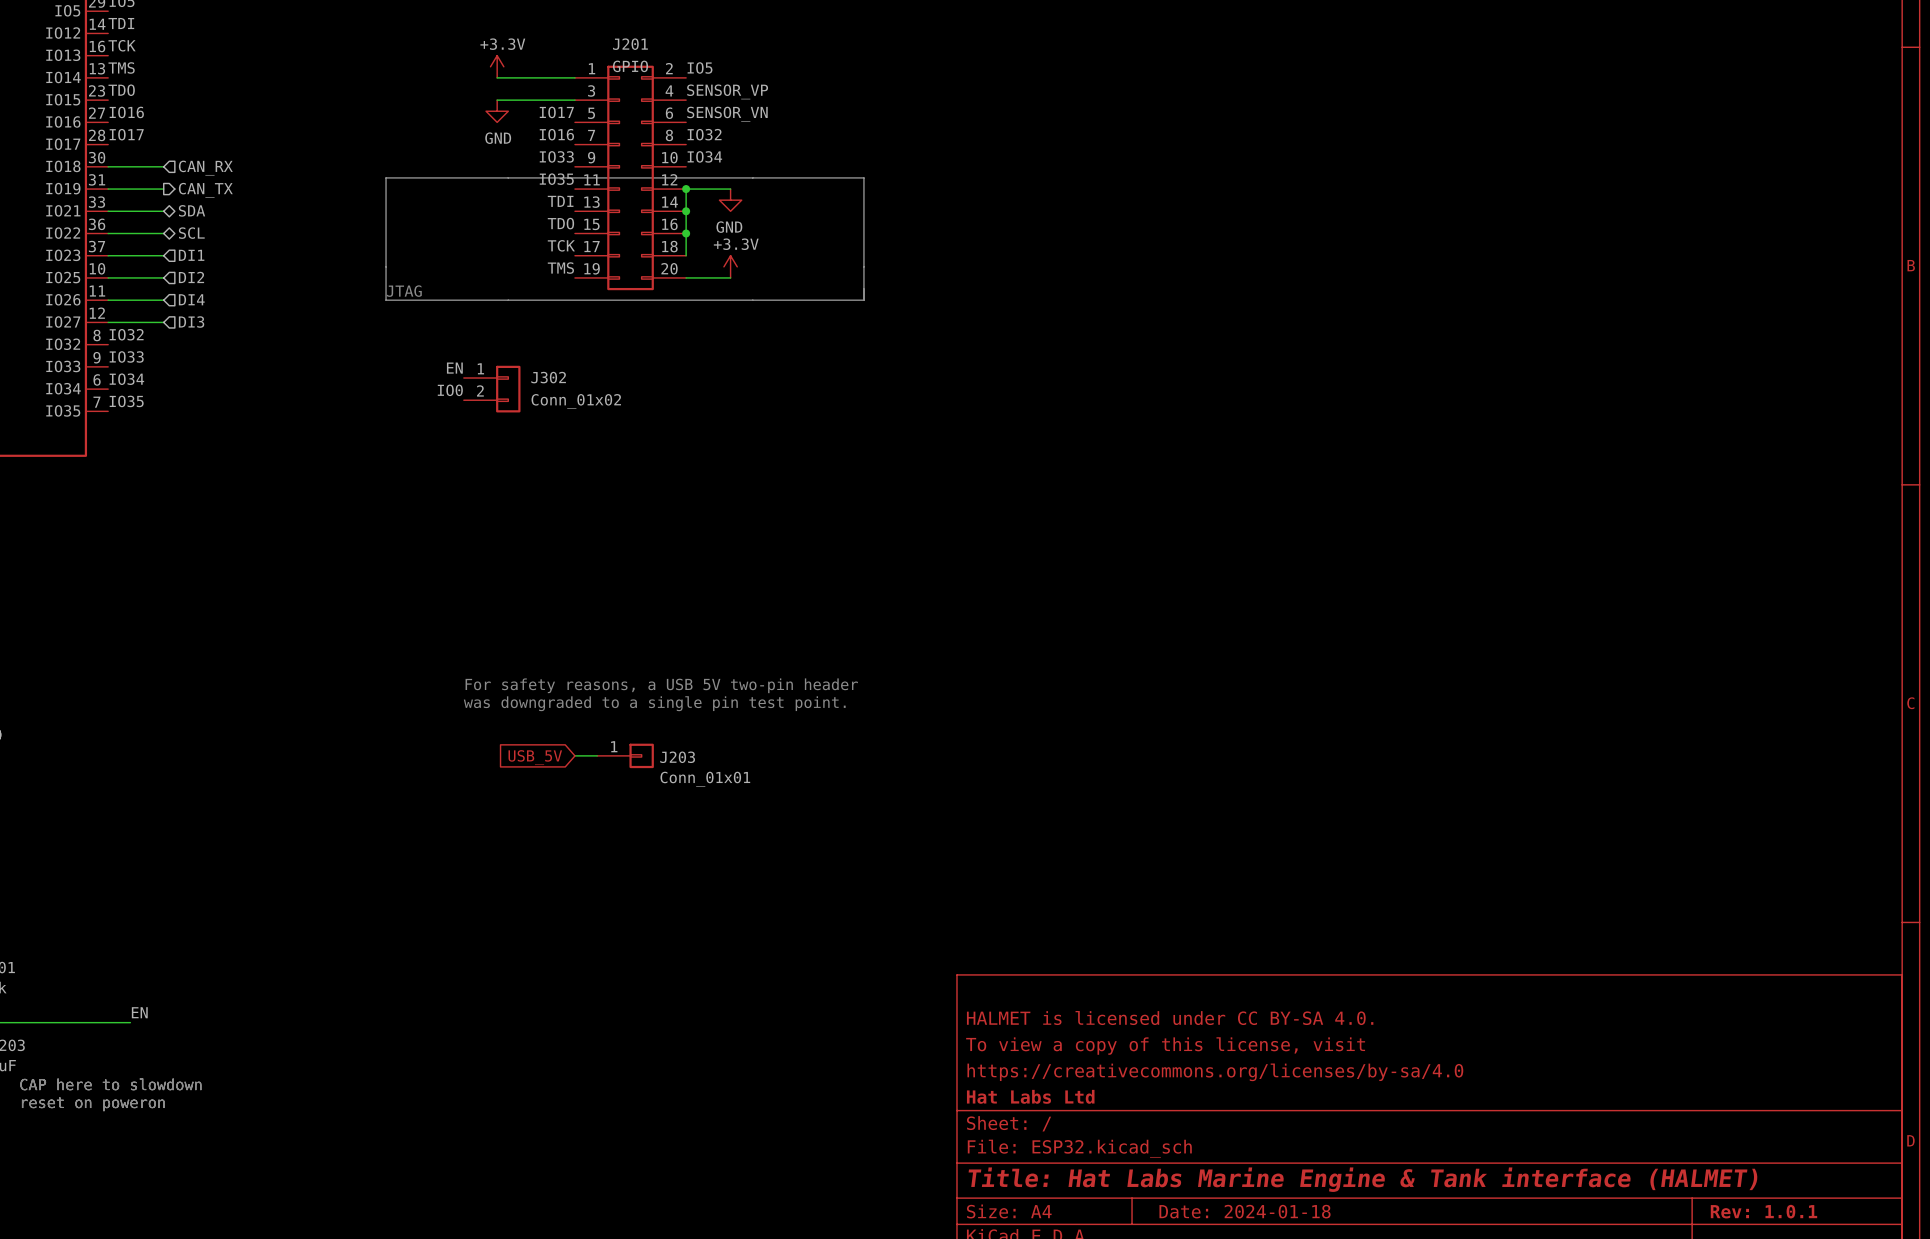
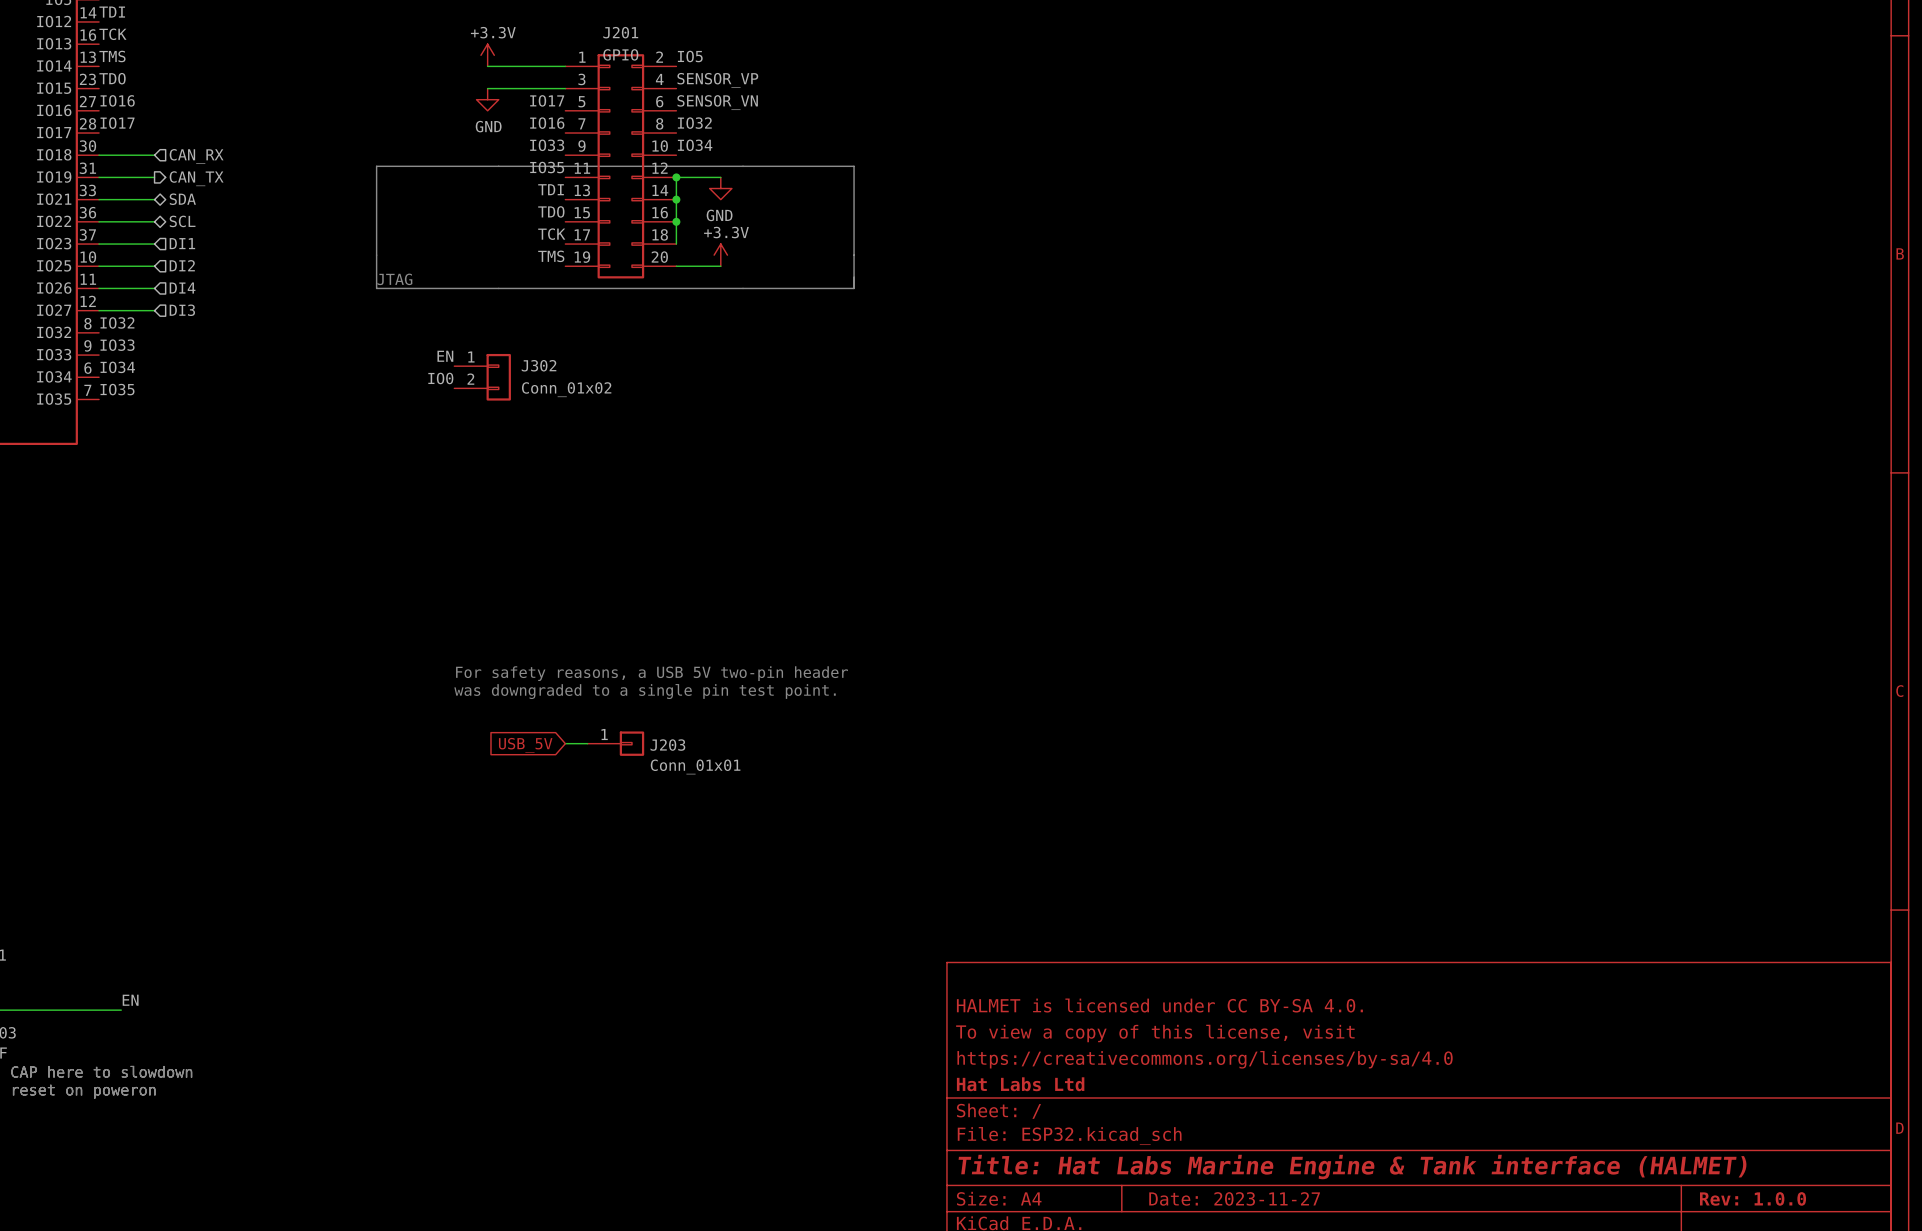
title block: Date: 2024-01-18 (1245, 1211) -> Date: 2023-11-27 (1234, 1198)
title block: Rev: 1.0.1 (1763, 1211) -> Rev: 1.0.0 (1753, 1198)

